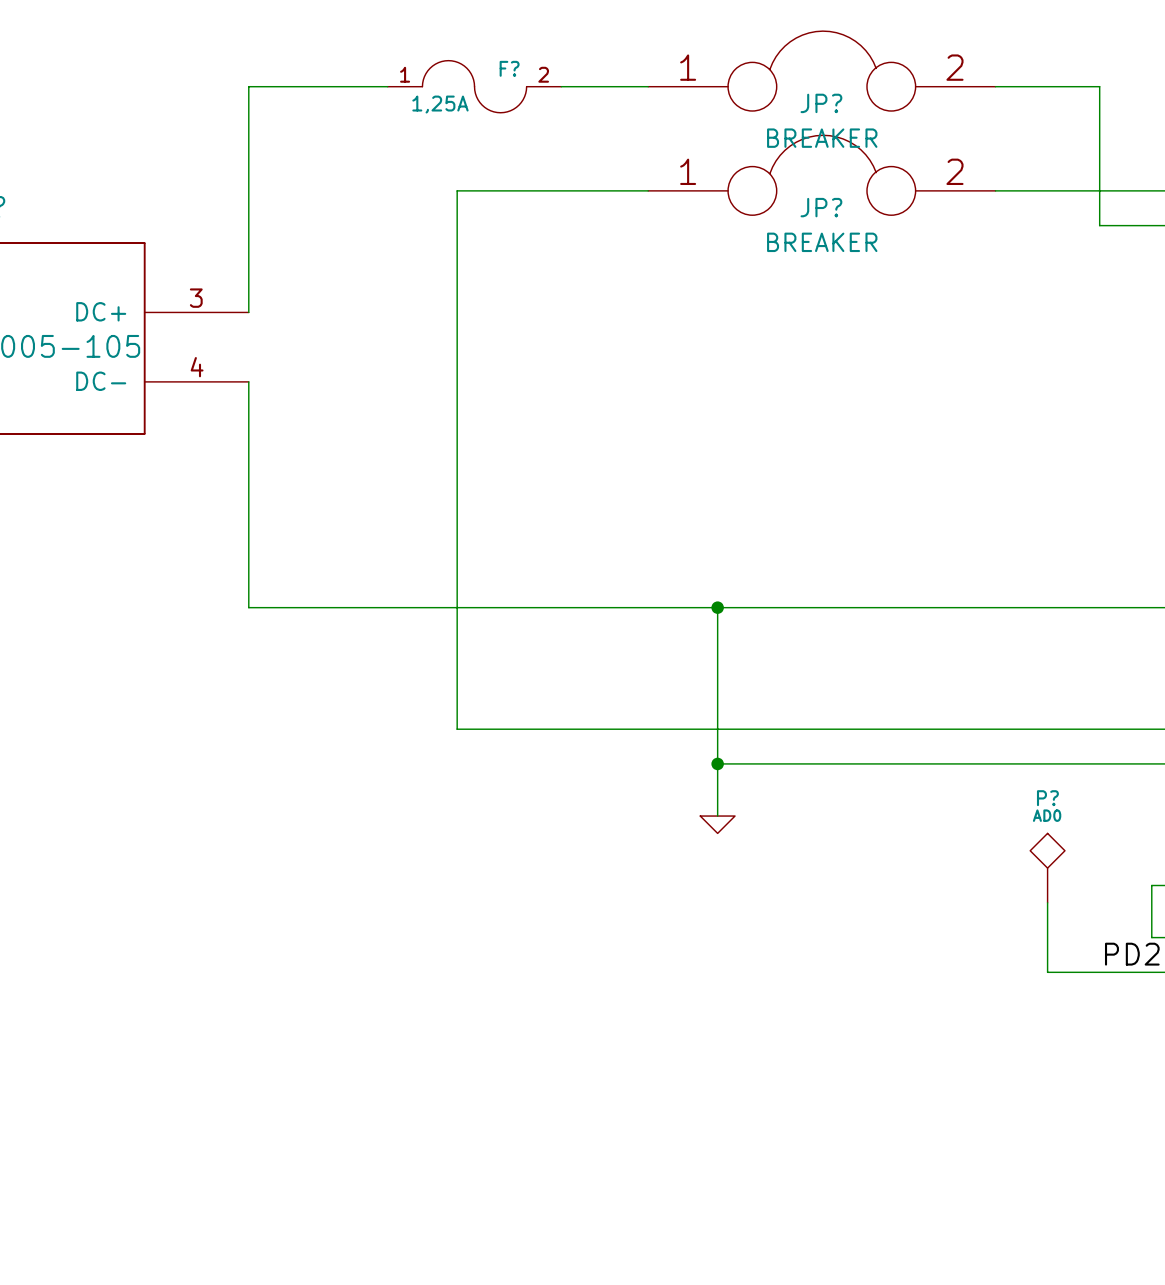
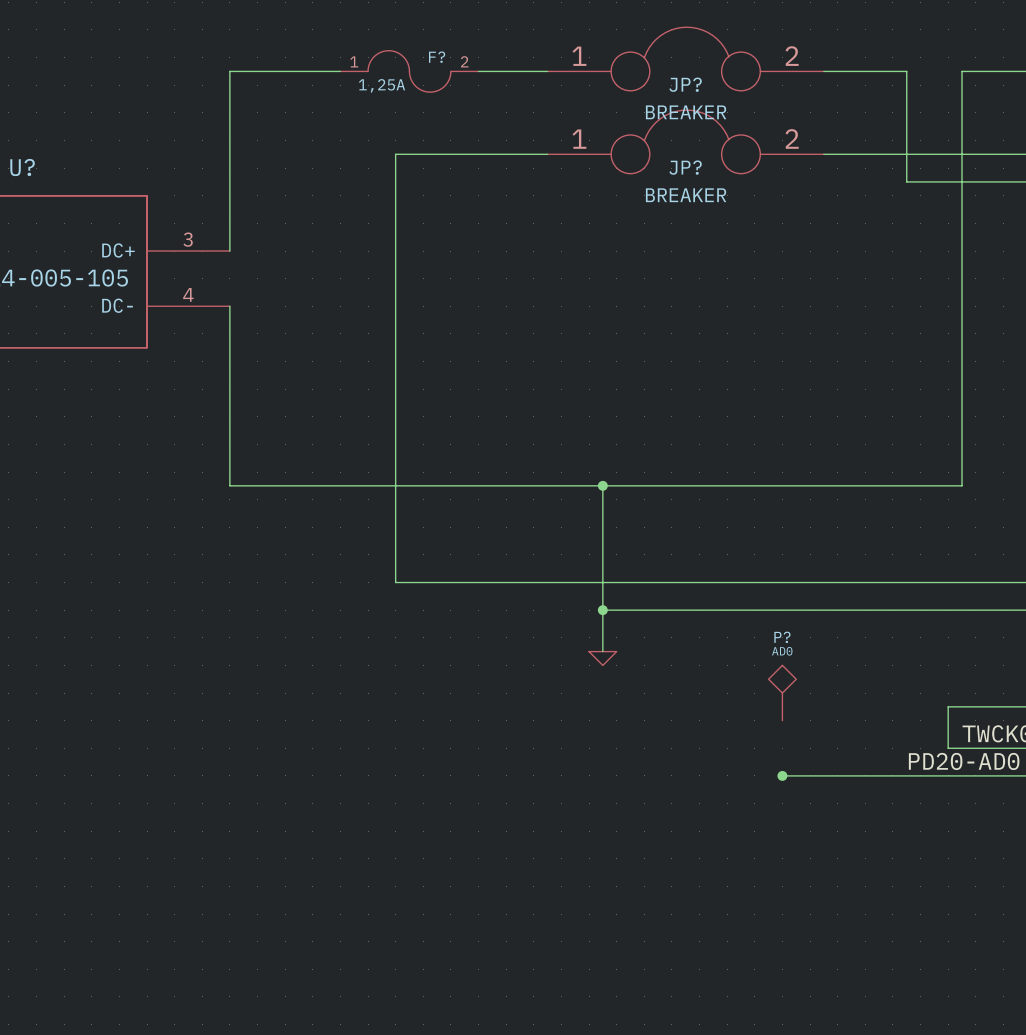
P? position: (1047, 868) -> (782, 693)
wire: (1047, 902) (1047, 972) -> (782, 775) (865, 775)
junction: none -> (782, 775)

